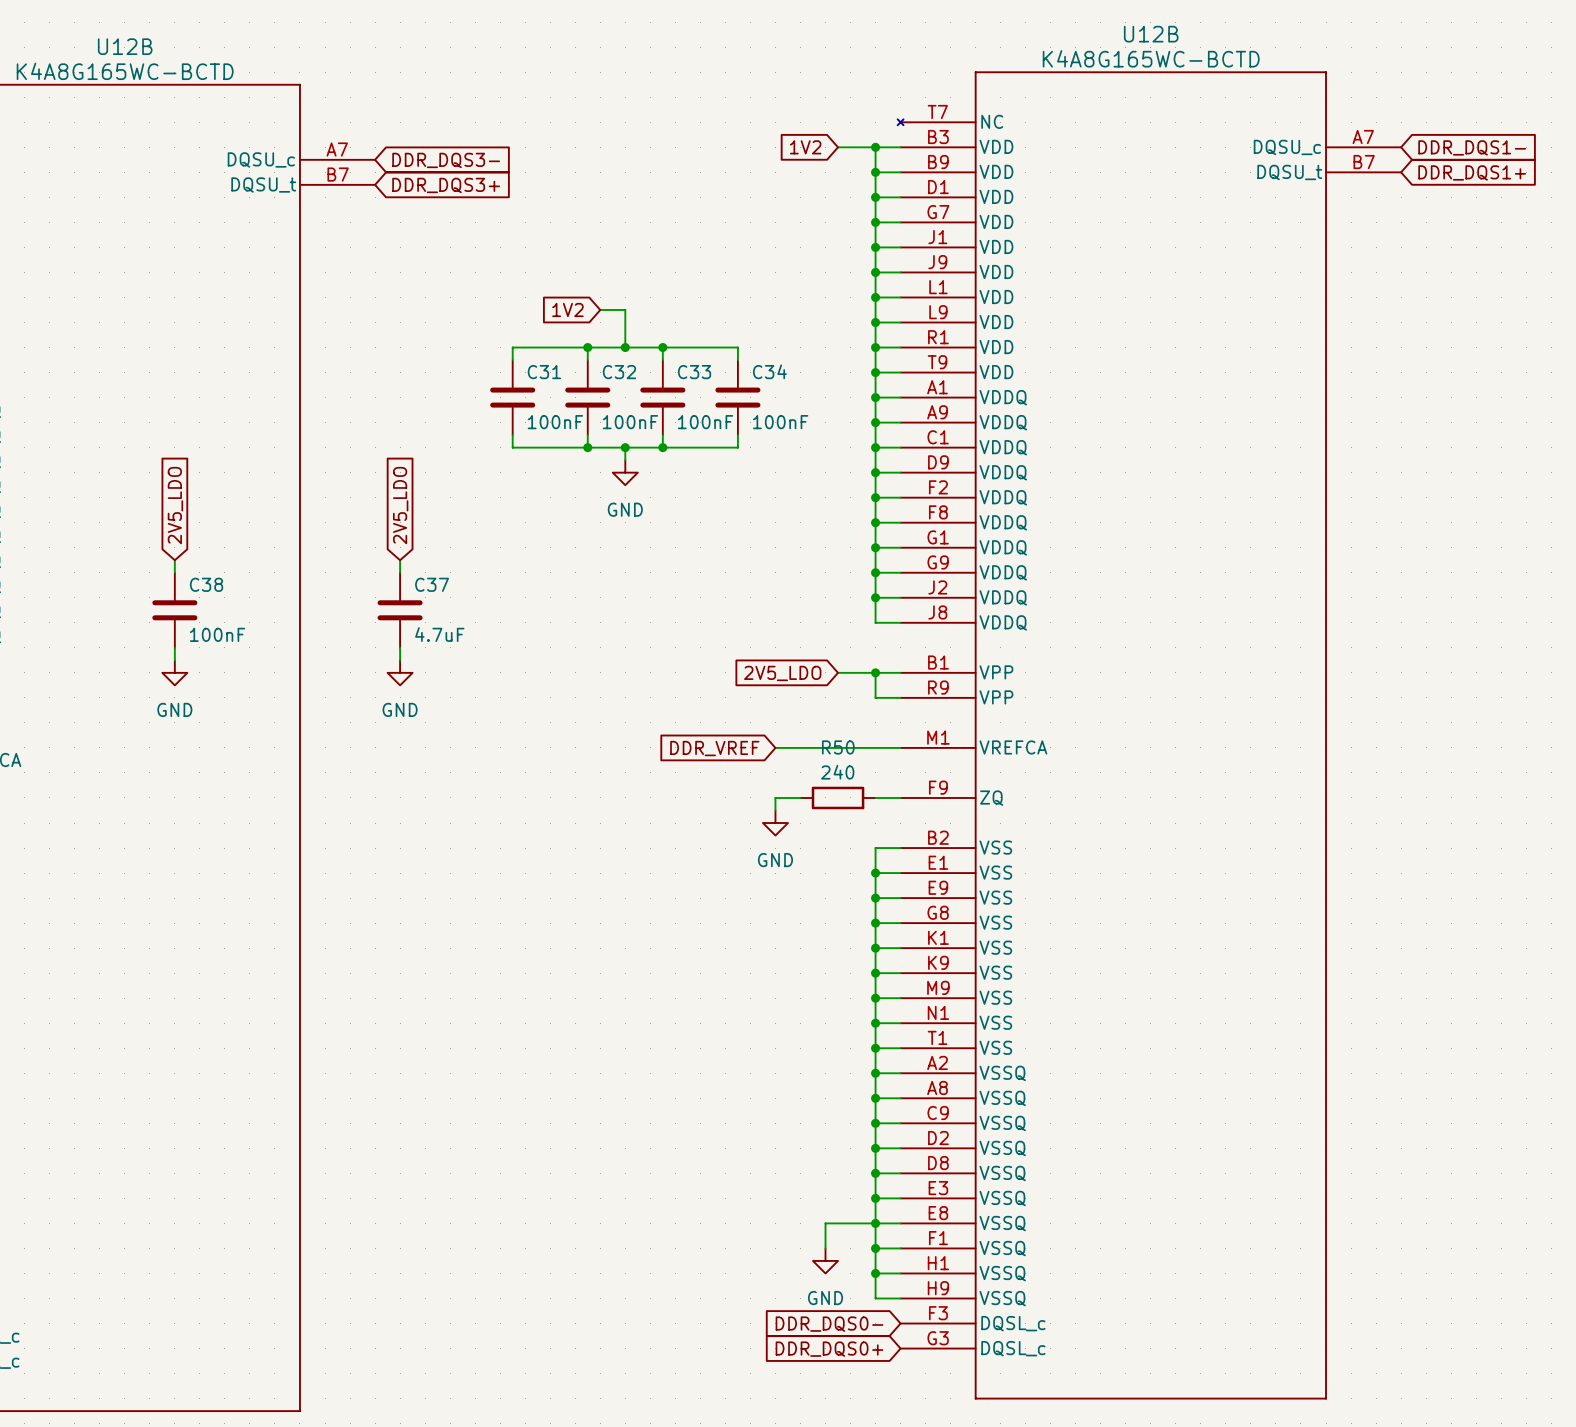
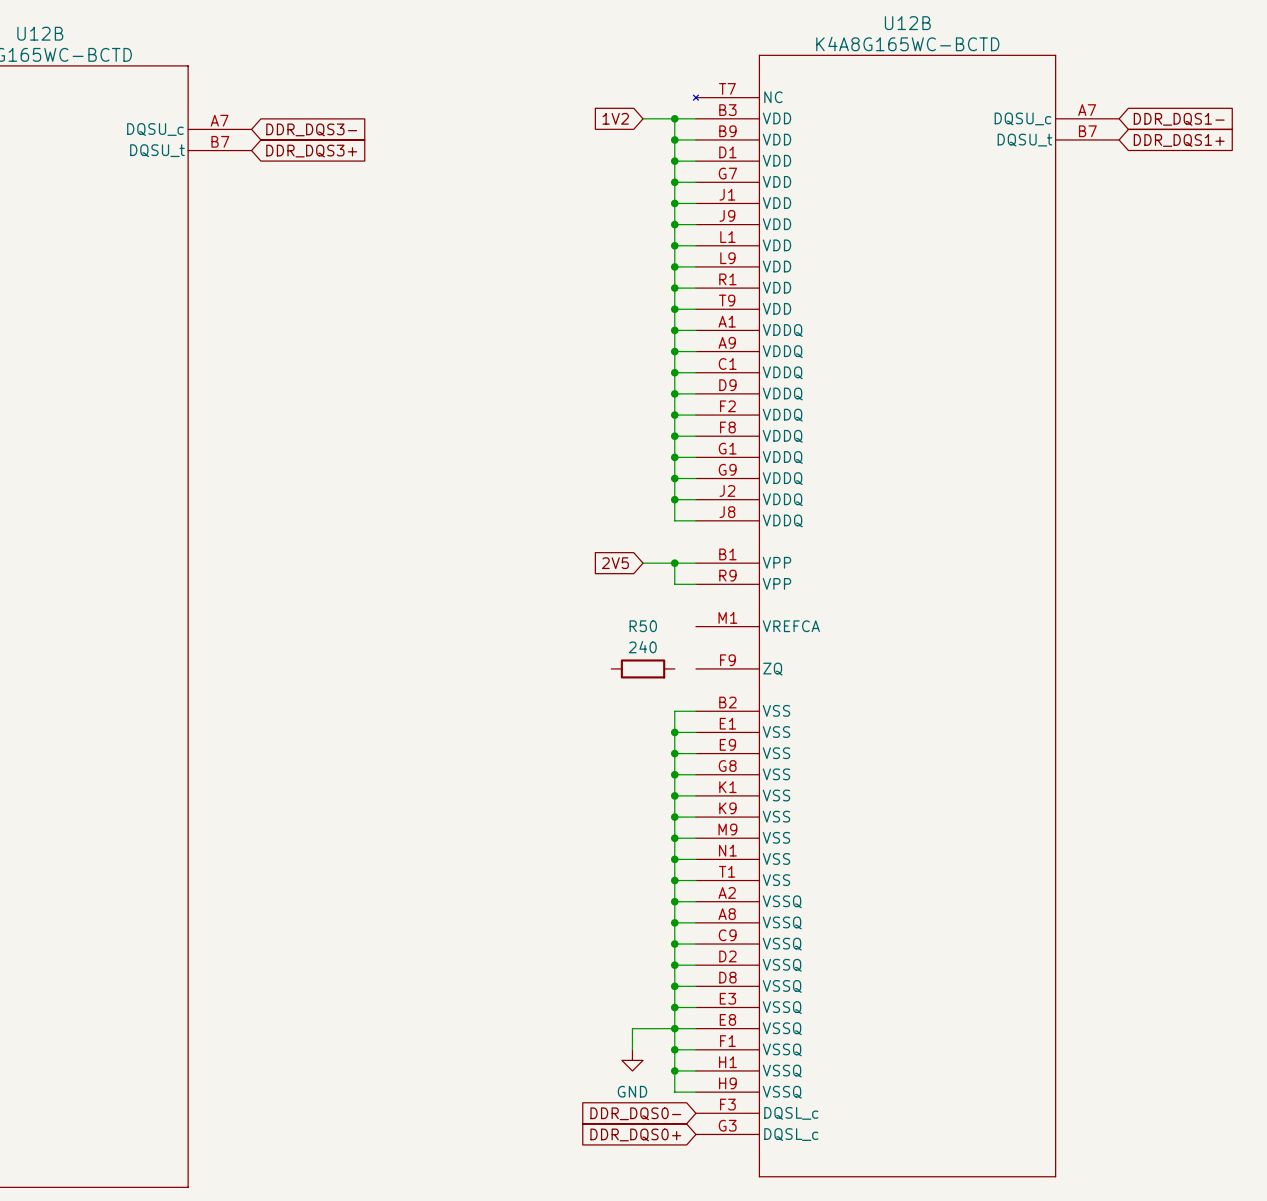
global label: 1V2 (567, 309) -> none
wire: (600, 309) (625, 309) (625, 347) -> none
wire: (587, 347) (587, 360) -> none
junction: (587, 347) -> none
junction: (625, 347) -> none
wire: (662, 347) (662, 360) -> none
junction: (662, 347) -> none
wire: (512, 360) (512, 347) (737, 347) (737, 360) -> none
C31: 100nF (512, 397) -> none
C32: 100nF (587, 397) -> none
C33: 100nF (662, 397) -> none
C34: 100nF (737, 397) -> none
wire: (512, 435) (512, 447) (737, 447) (737, 435) -> none
wire: (587, 435) (587, 447) -> none
wire: (662, 435) (662, 447) -> none
junction: (587, 447) -> none
wire: (625, 447) (625, 460) -> none
junction: (625, 447) -> none
junction: (662, 447) -> none
power symbol: GND (625, 472) -> none
global label: 2V5_LDO (175, 505) -> none
global label: 2V5_LDO (400, 505) -> none
wire: (174, 560) (174, 572) -> none
wire: (400, 560) (400, 572) -> none
C38: 100nF (174, 610) -> none
C37: 4.7uF (400, 610) -> none
wire: (174, 647) (174, 660) -> none
wire: (400, 647) (400, 660) -> none
power symbol: GND (174, 672) -> none
power symbol: GND (400, 672) -> none
global label: 2V5_LDO (782, 673) -> 2V5 (615, 563)
wire: (775, 747) (900, 747) -> none
global label: DDR_VREF (714, 748) -> none
wire: (800, 797) (775, 797) (775, 810) -> none
wire: (875, 797) (900, 797) -> none
power symbol: GND (775, 823) -> none

